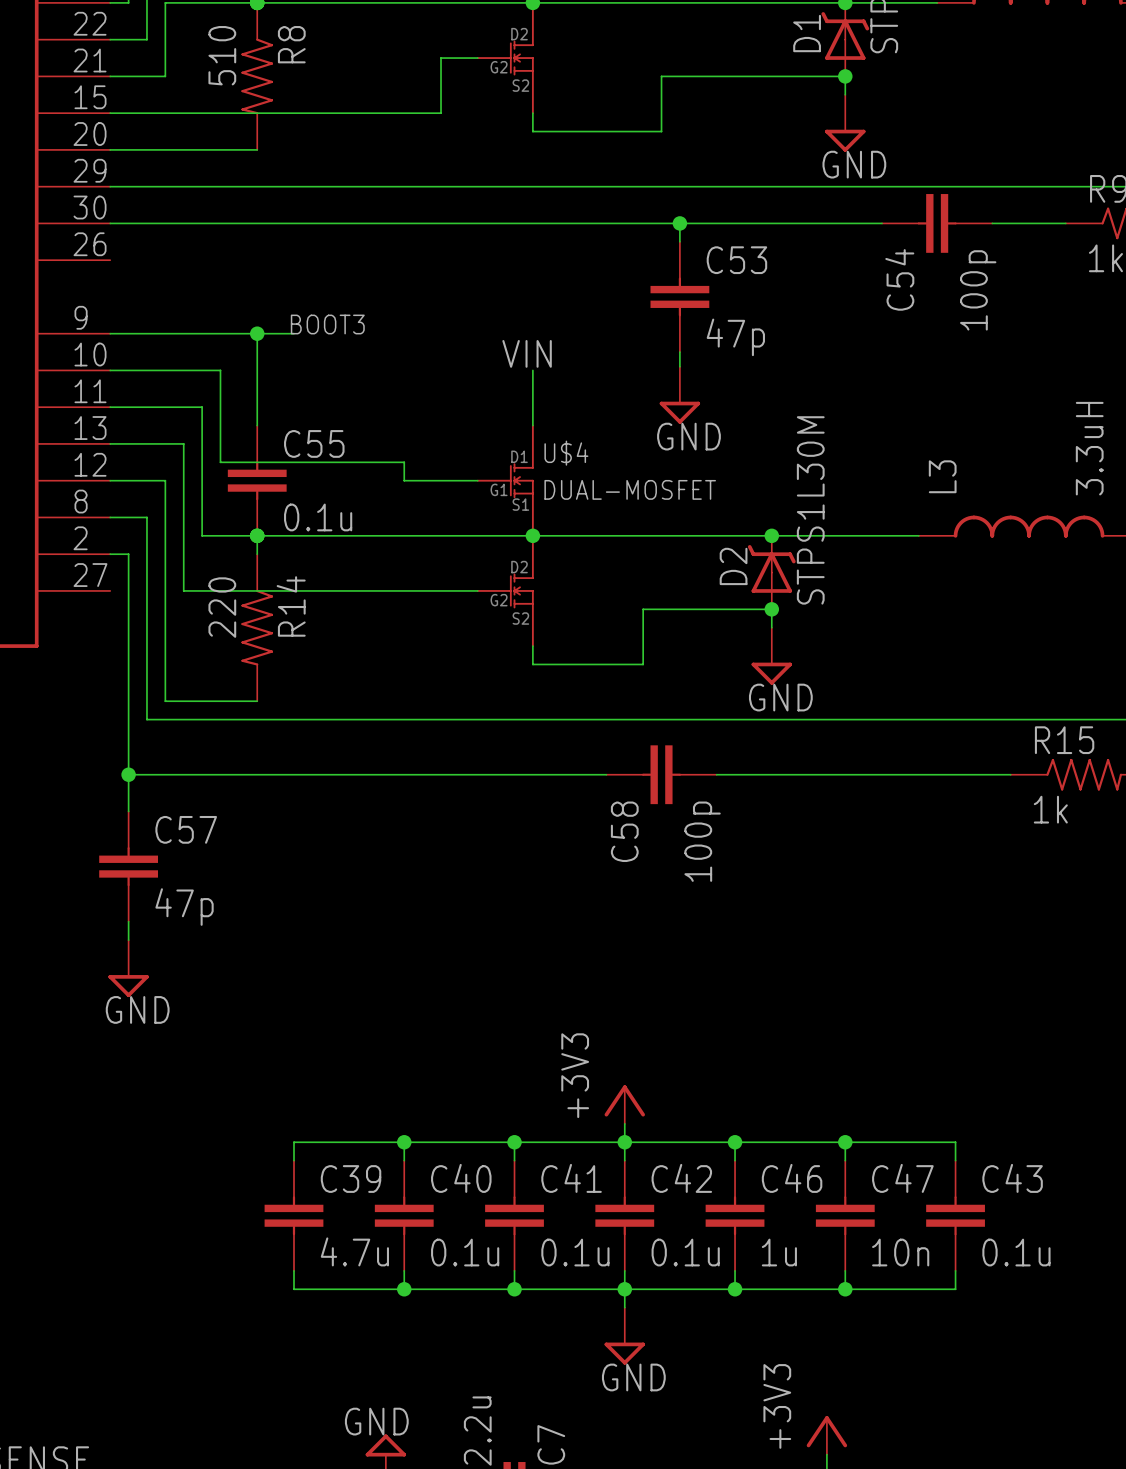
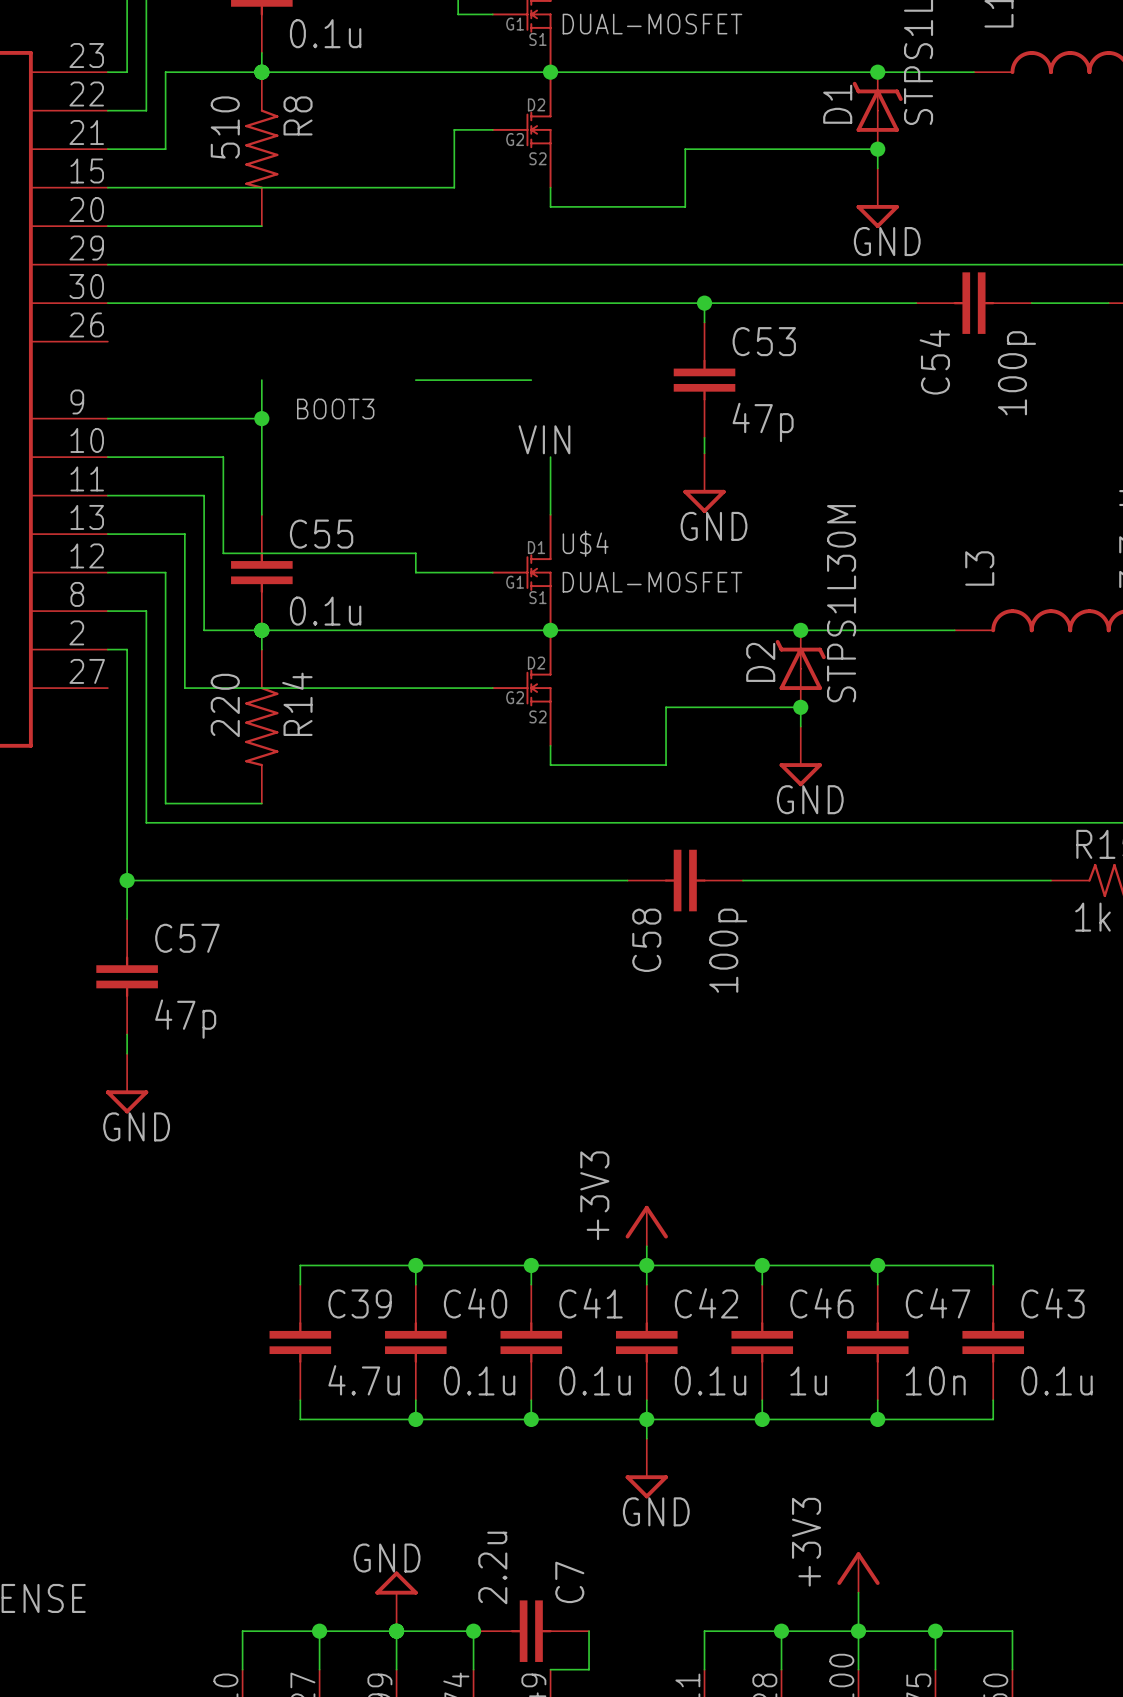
wire: none -> (415, 380) (531, 380)
wire: (257, 333) (293, 333) -> (261, 418) (261, 380)

